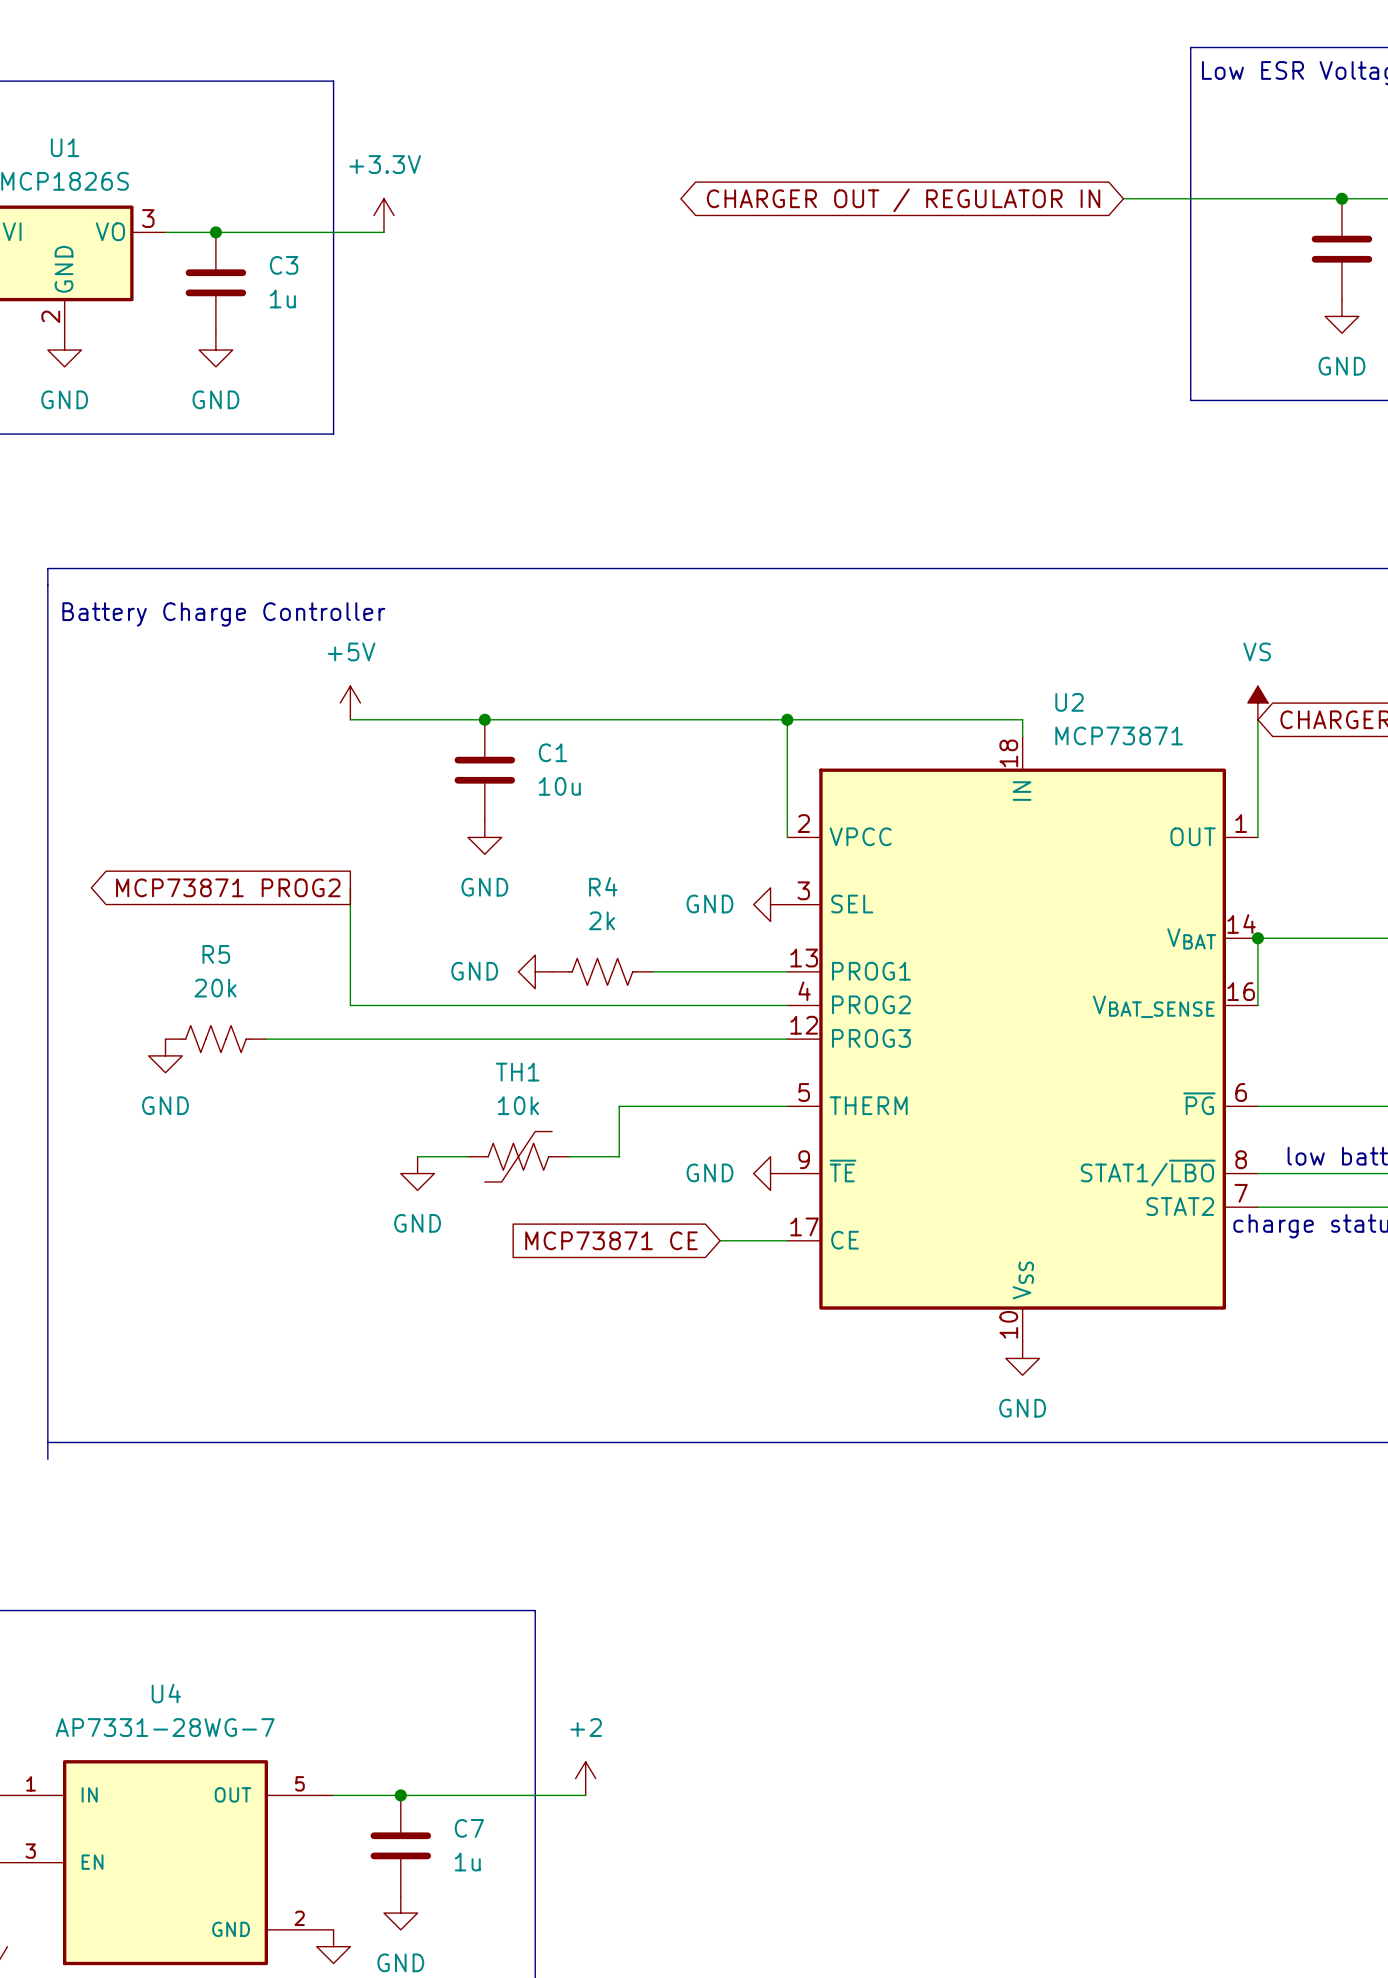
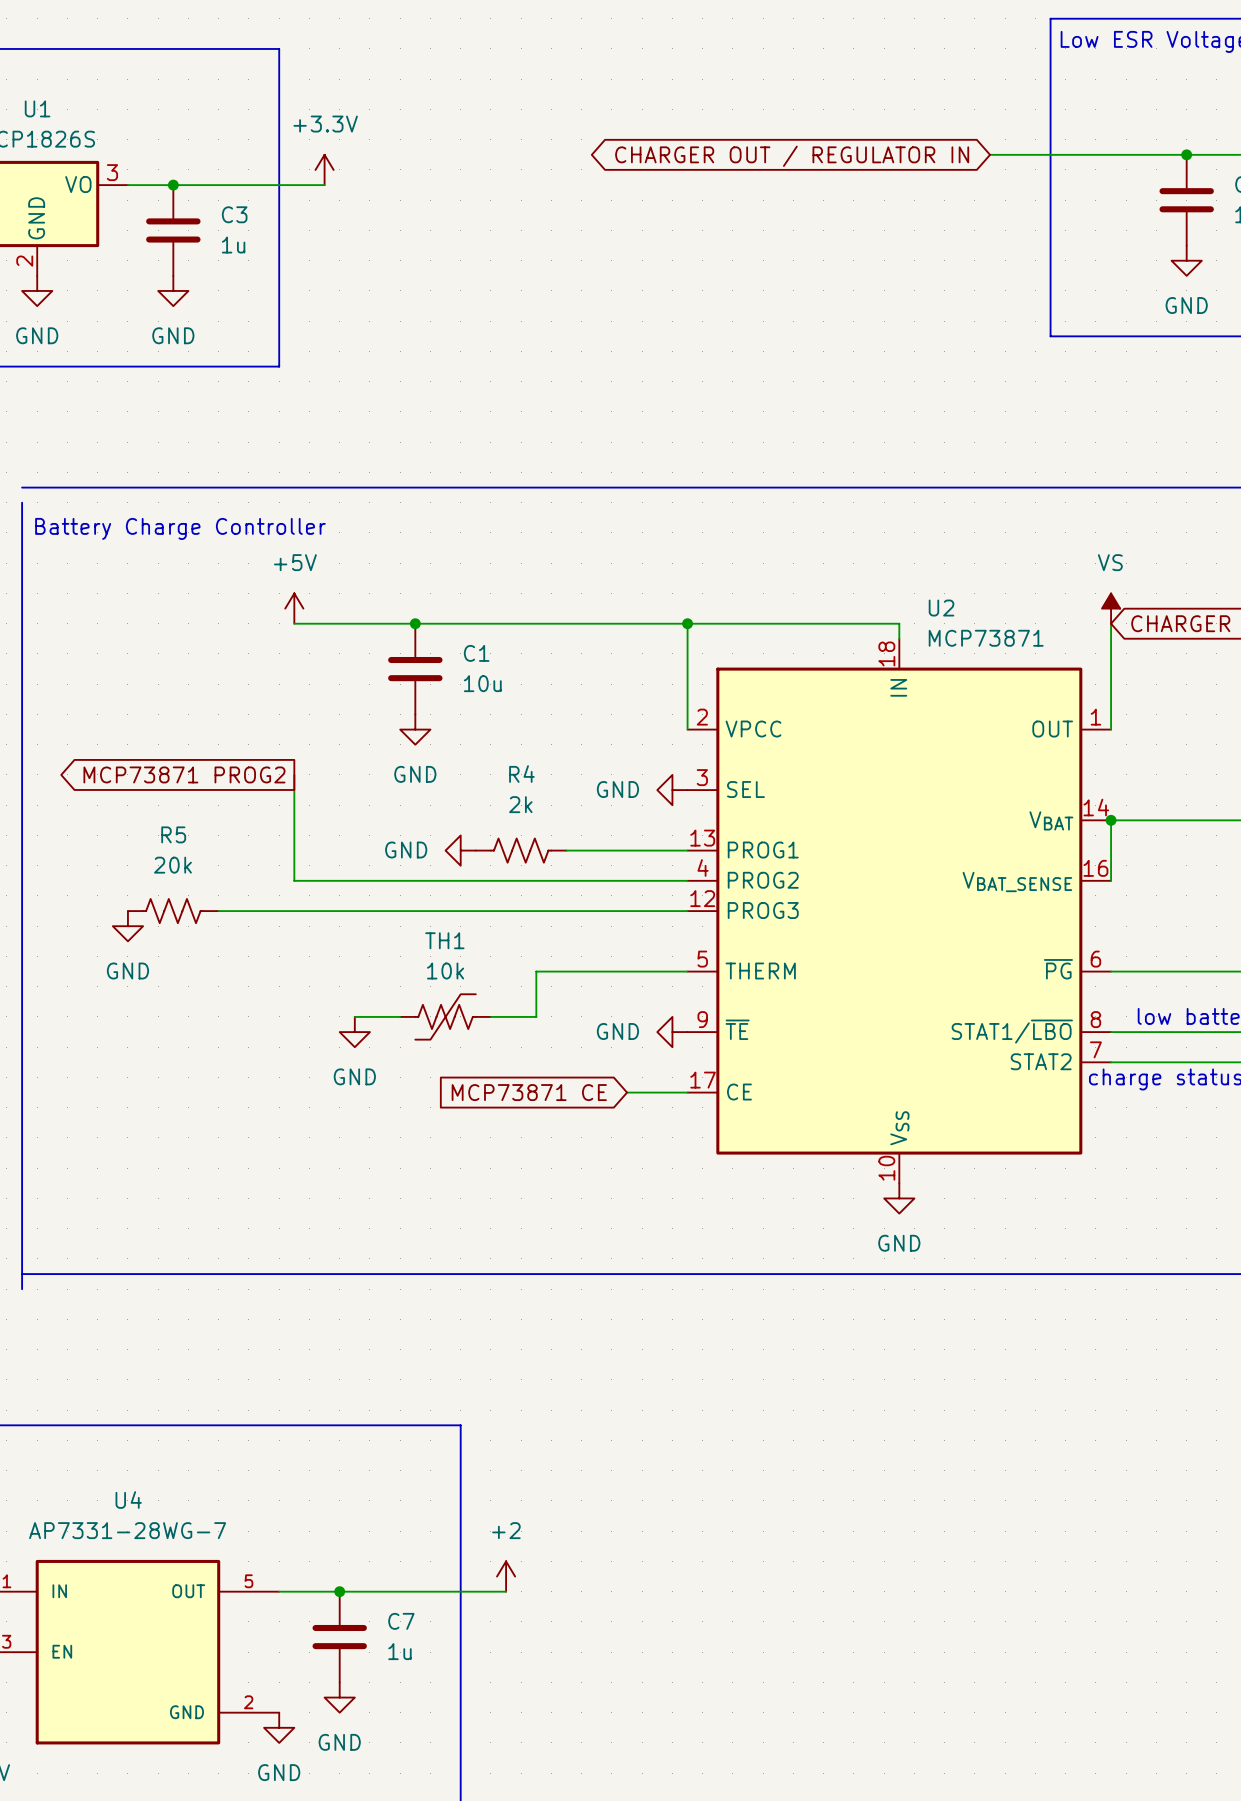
line: (47, 568) (47, 585) -> none

